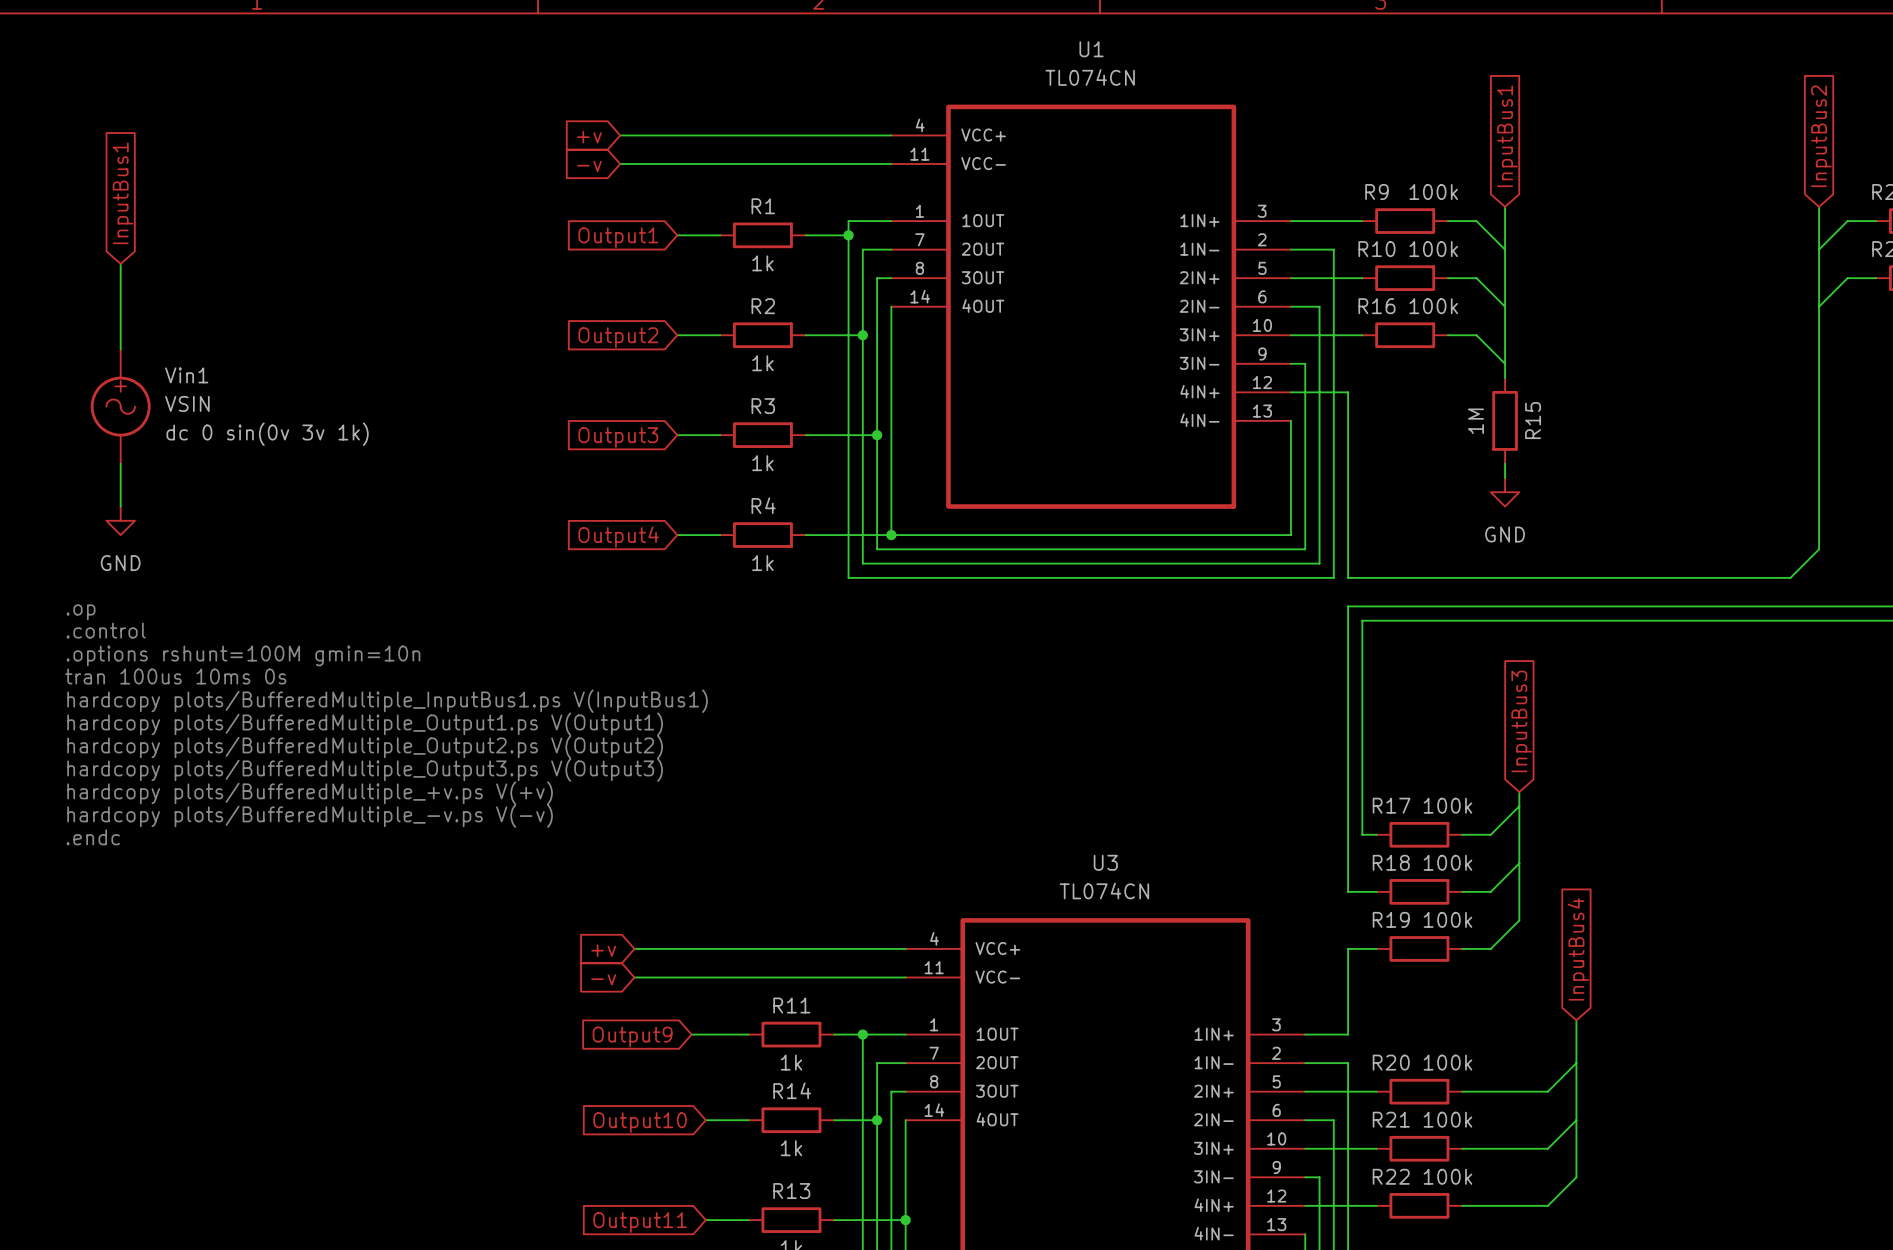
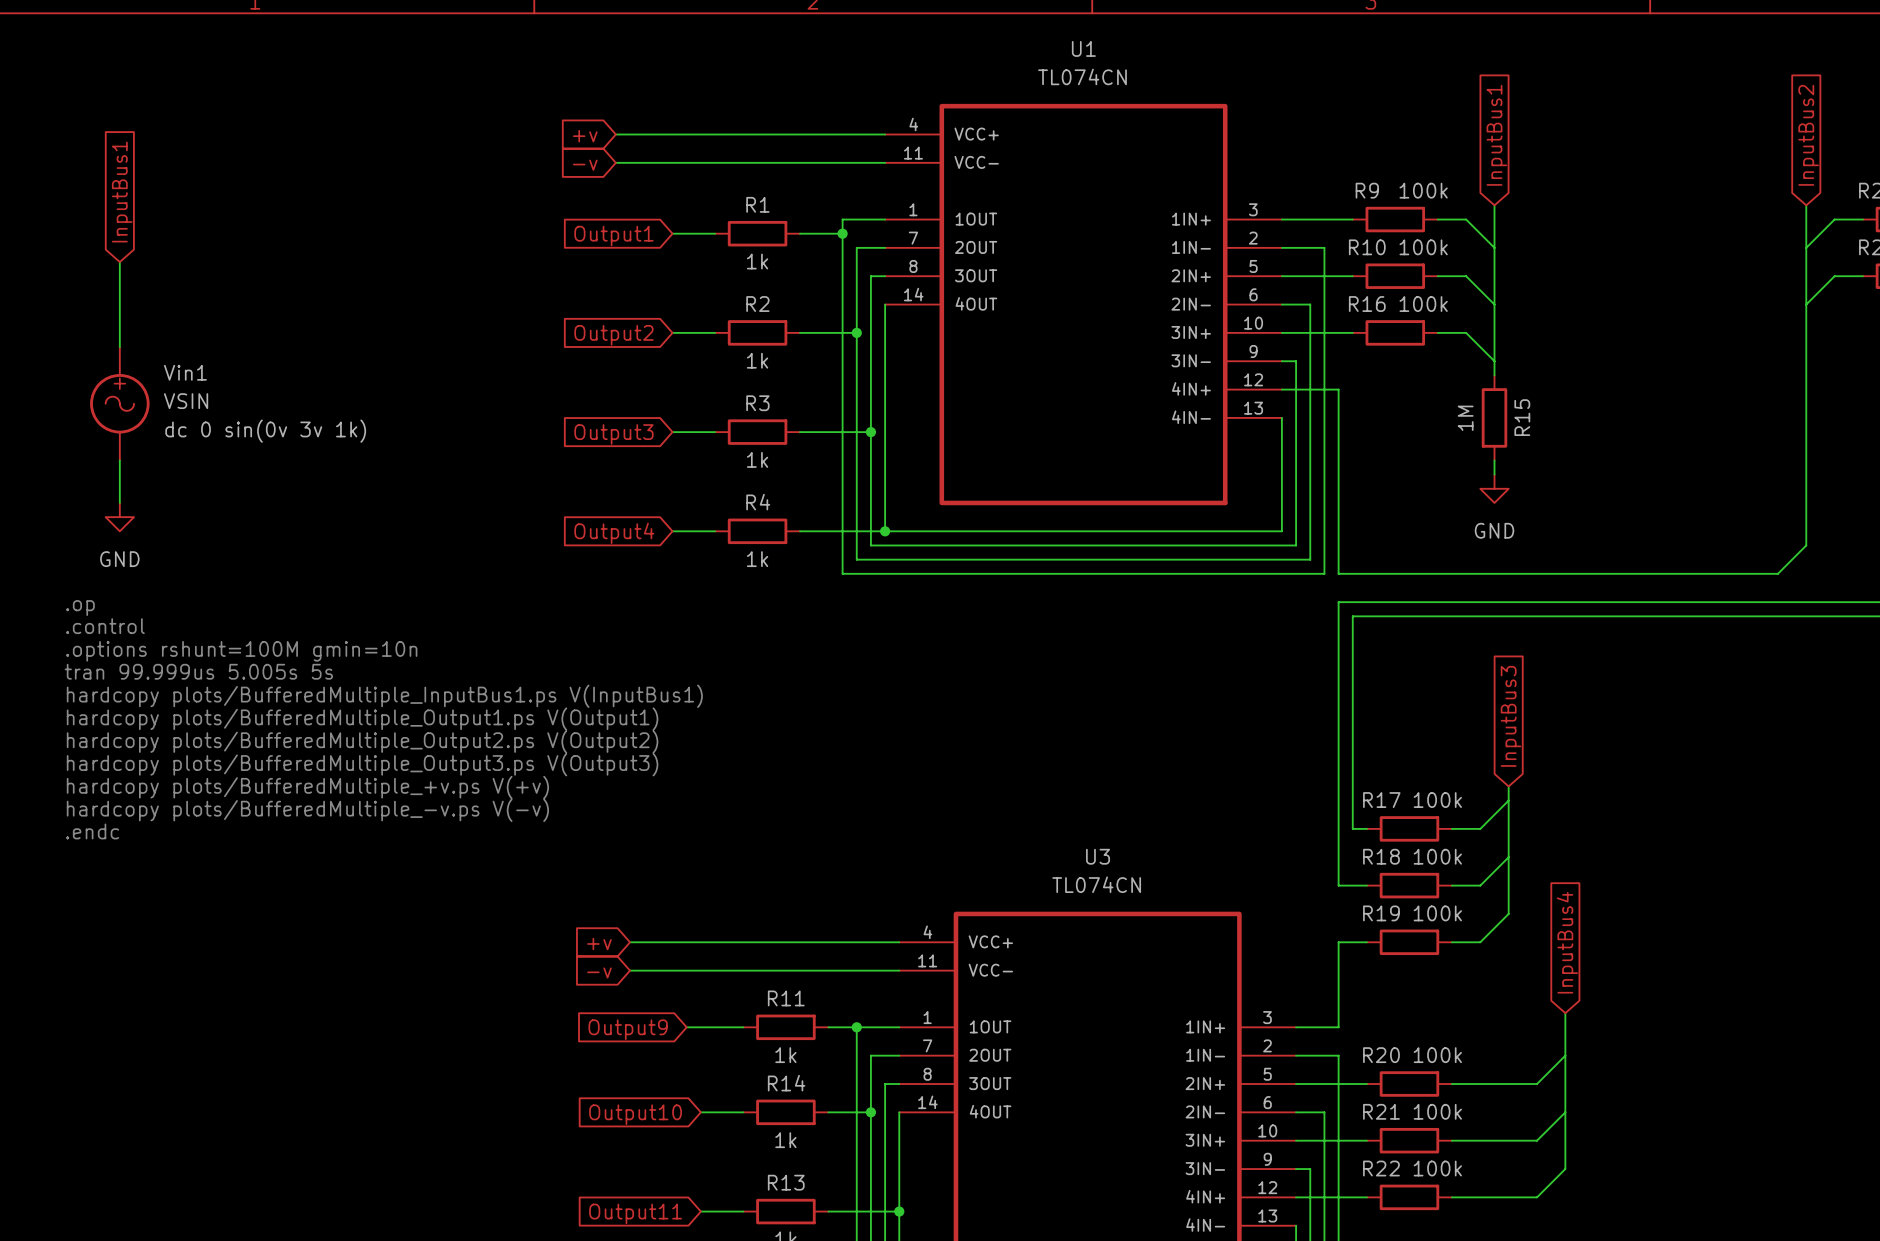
text: tran 100us 10ms 0s (175, 676) -> tran 99.999us 5.005s 5s (198, 671)

